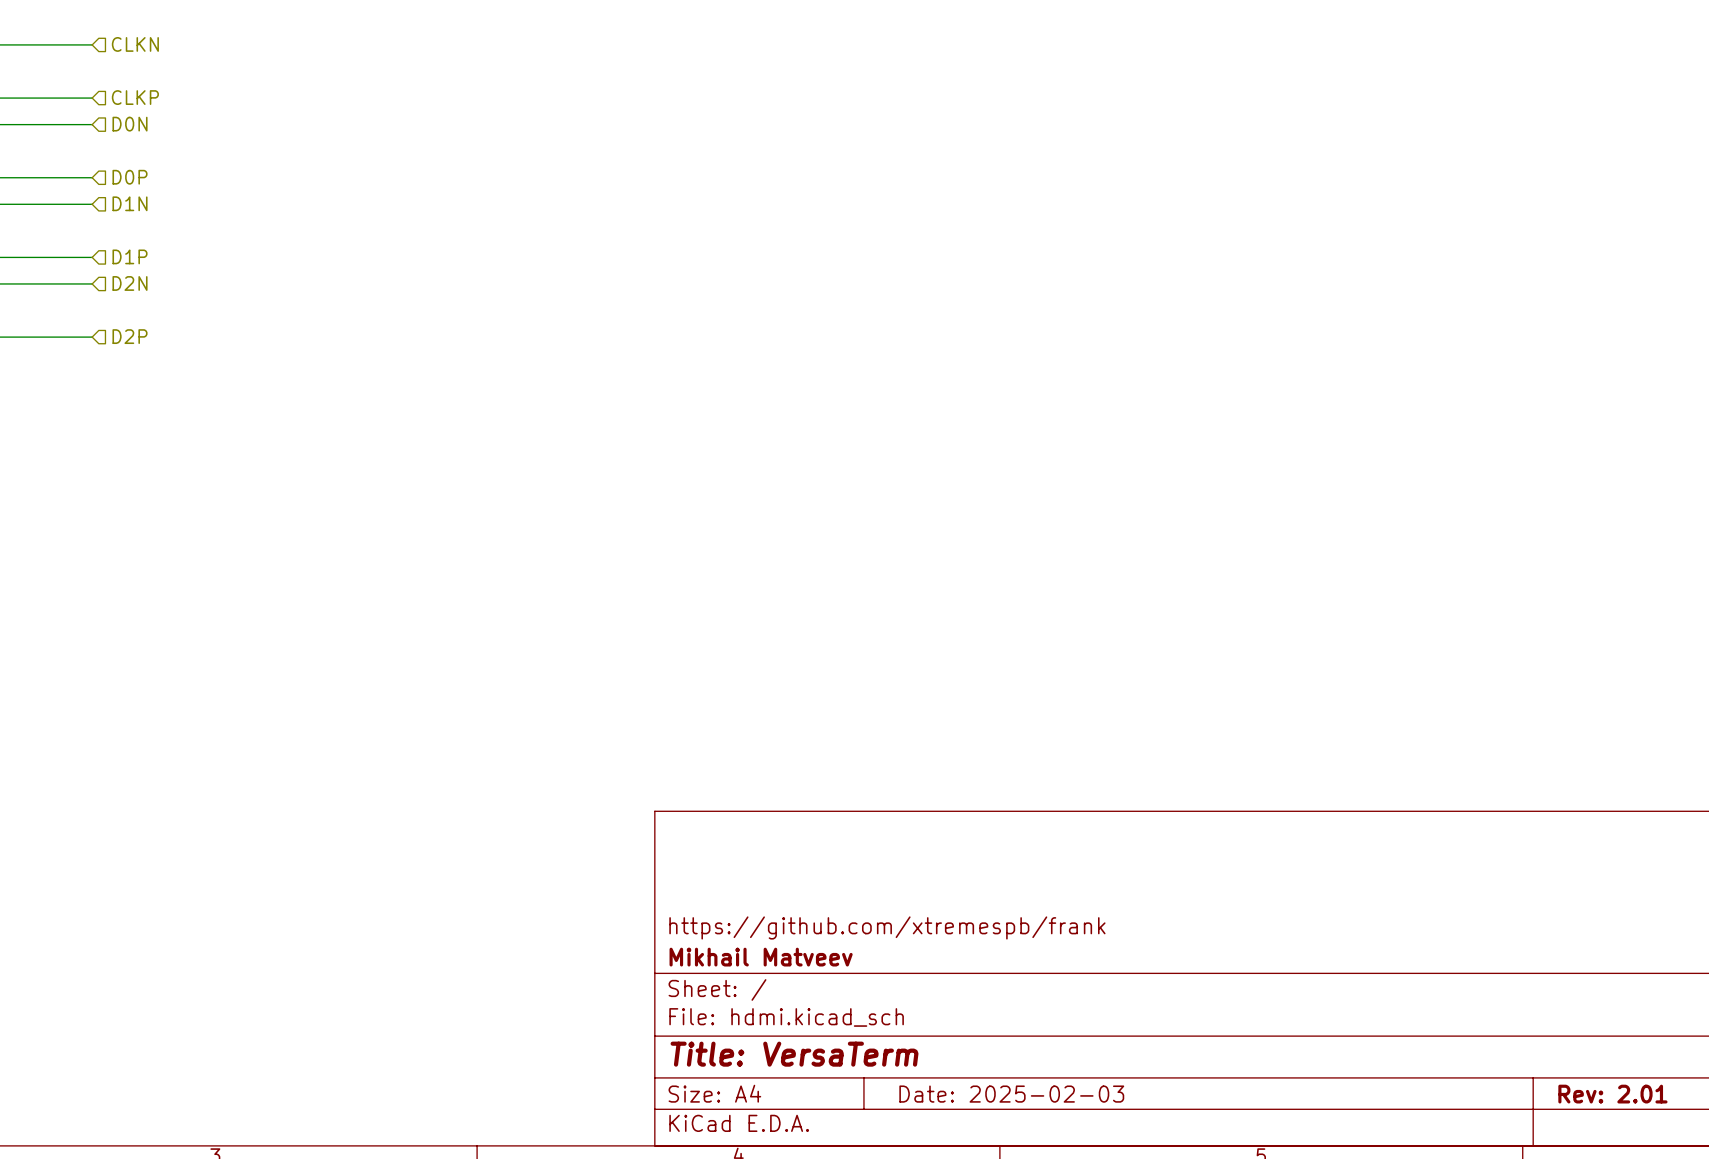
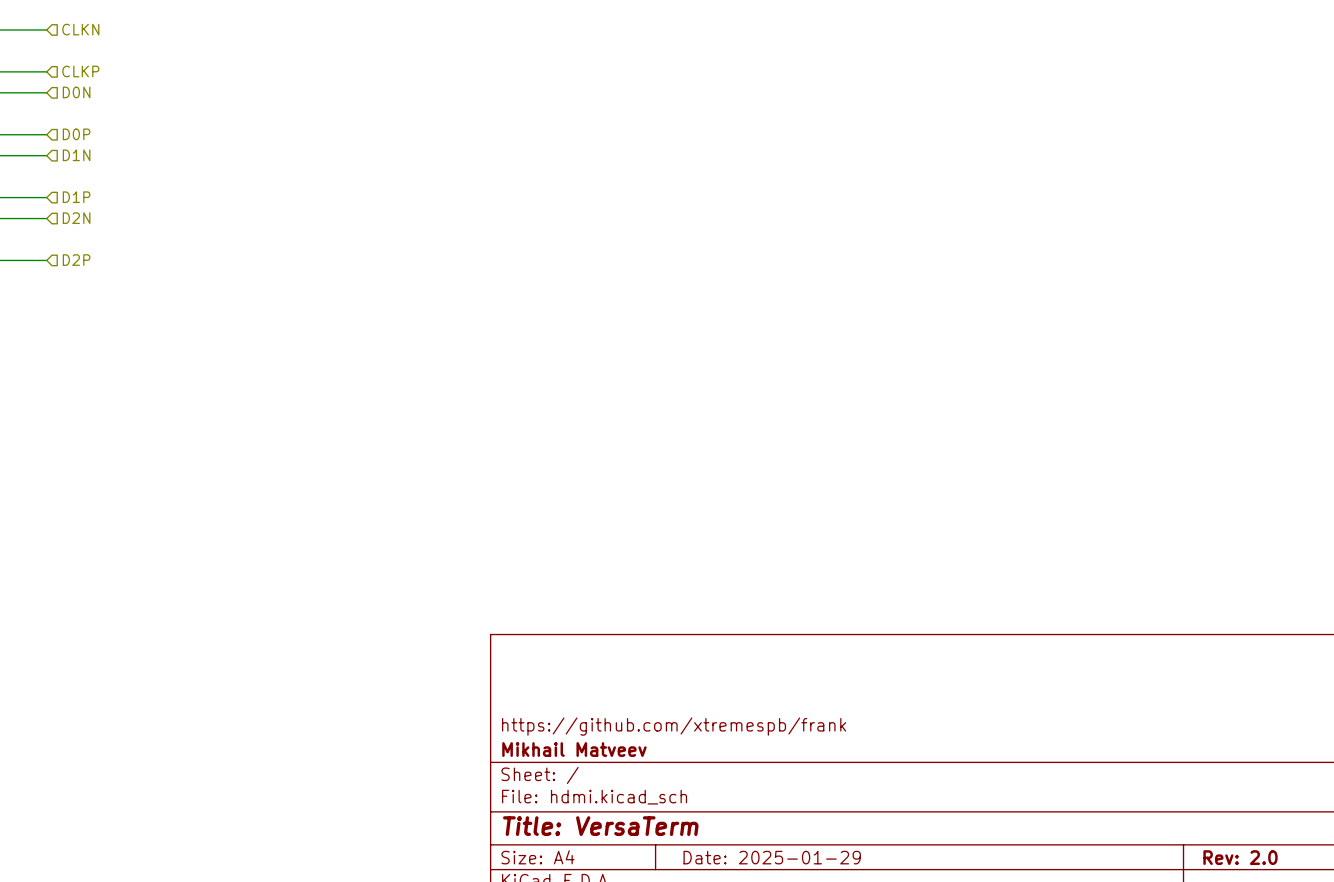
title block: Date: 2025-02-03 (1011, 1094) -> Date: 2025-01-29 (772, 857)
title block: Rev: 2.01 (1612, 1094) -> Rev: 2.0 (1240, 857)

